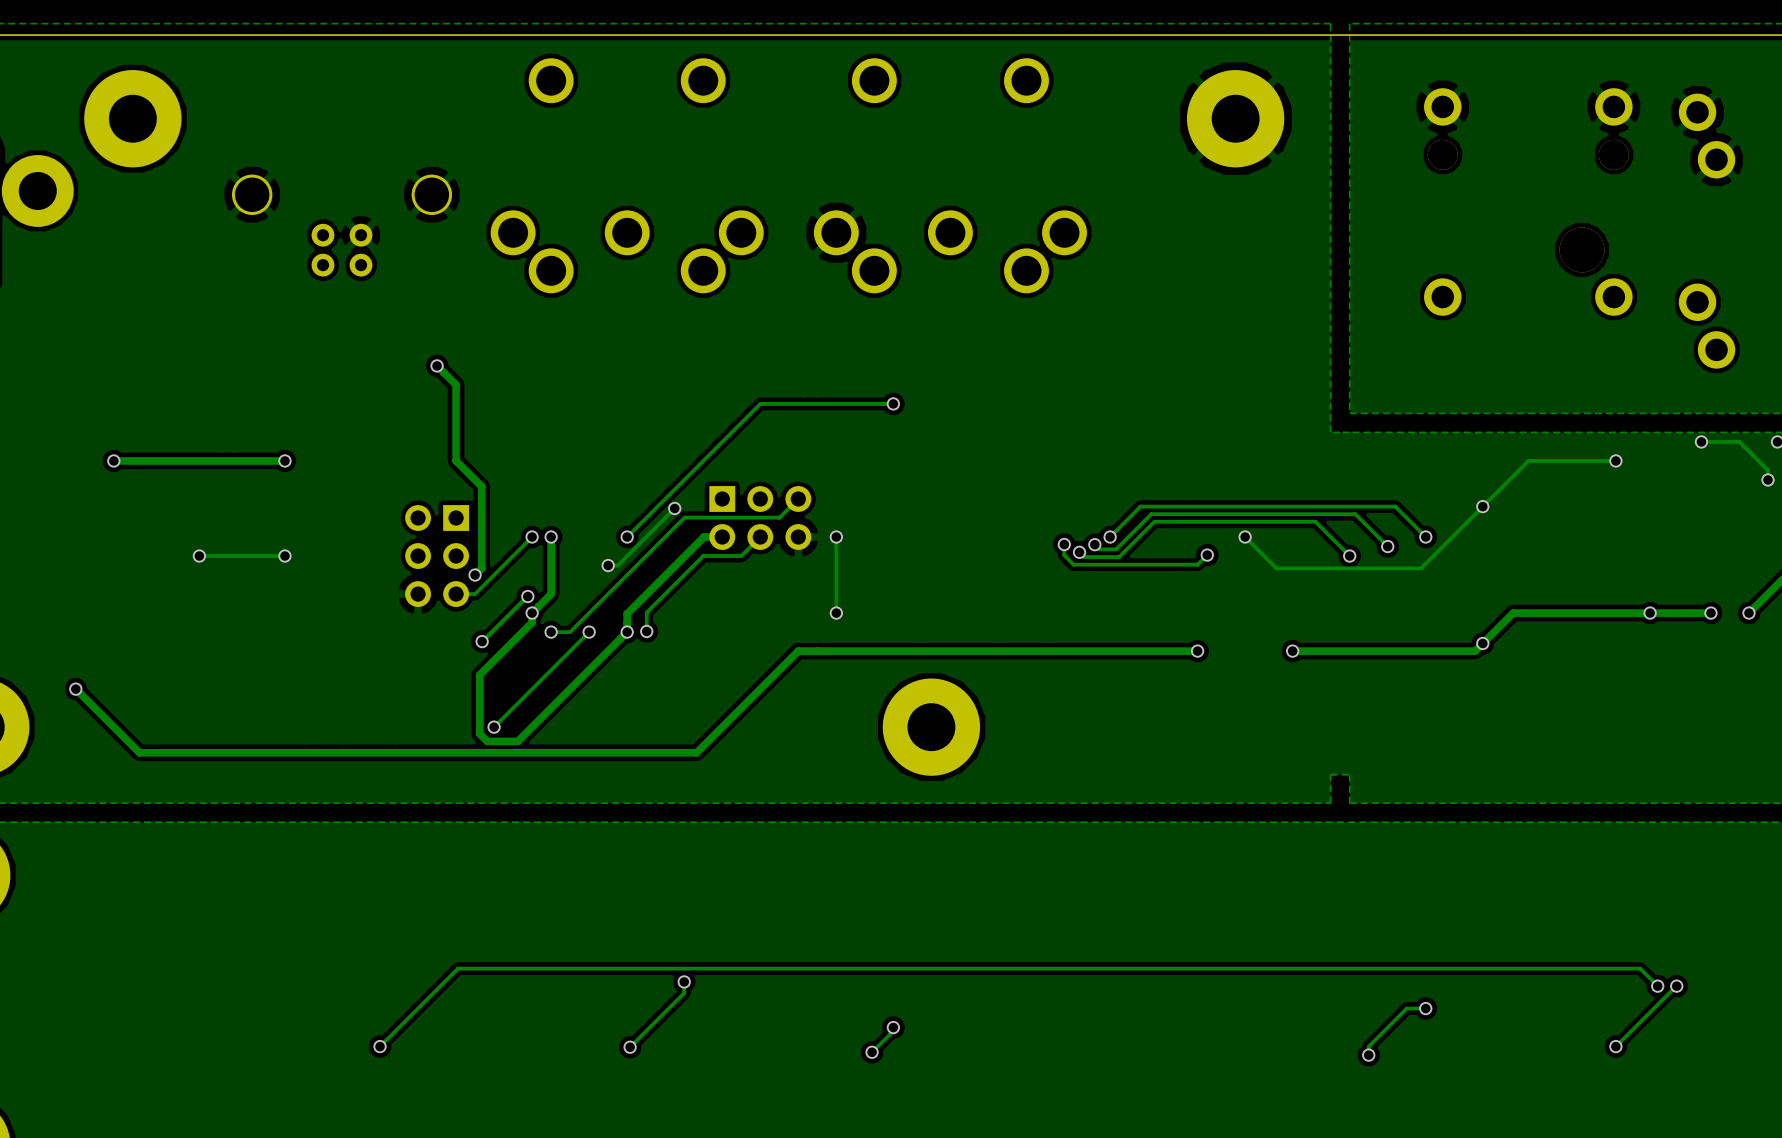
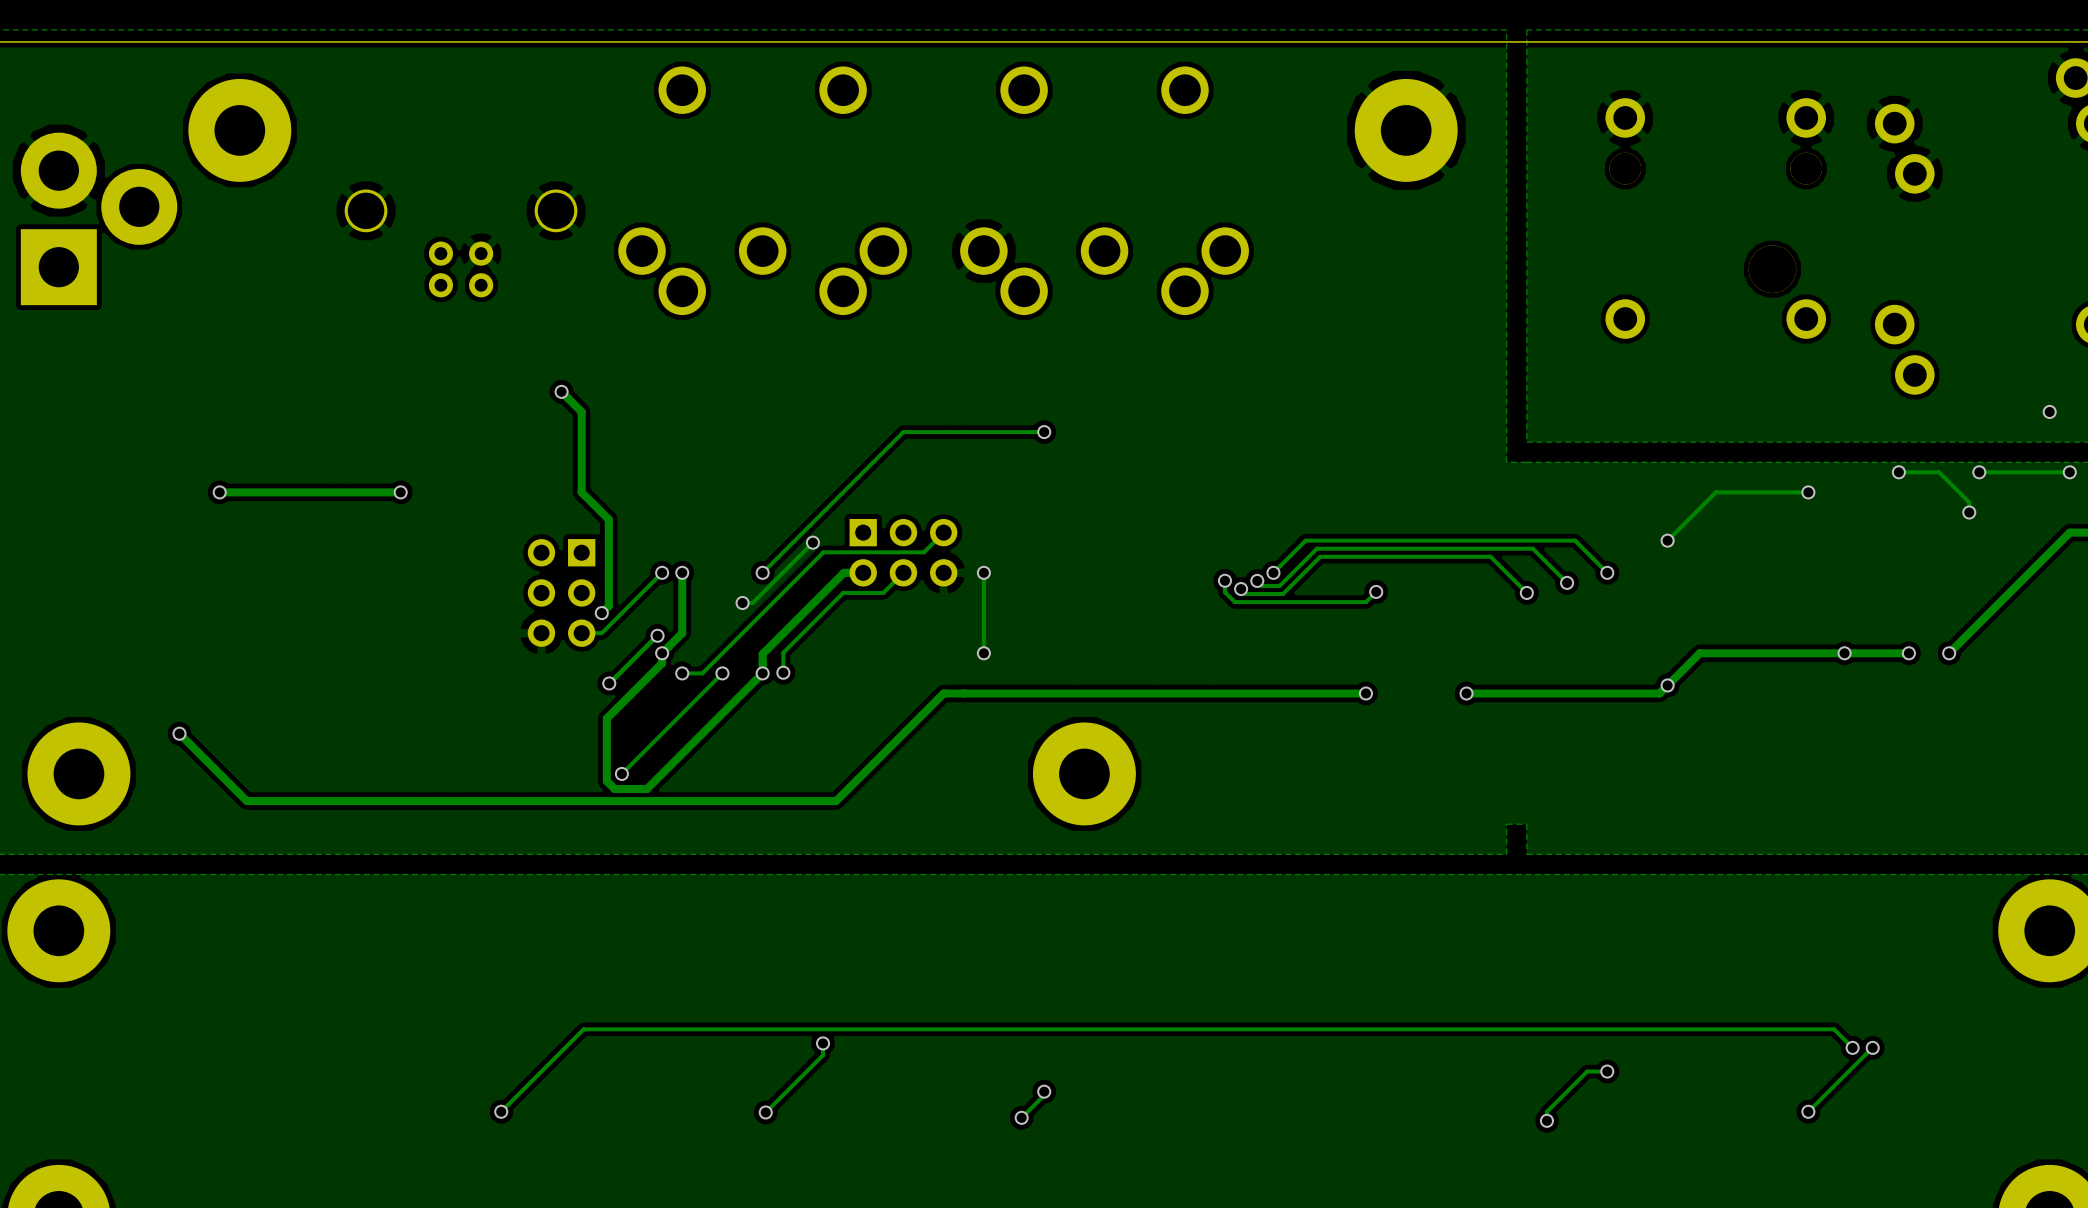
track: (1482, 506) (1421, 568) (1276, 568) (1245, 537) -> none
via: (1245, 537) -> none
via: (199, 556) -> none
track: (284, 556) (199, 556) -> none
via: (284, 556) -> none

